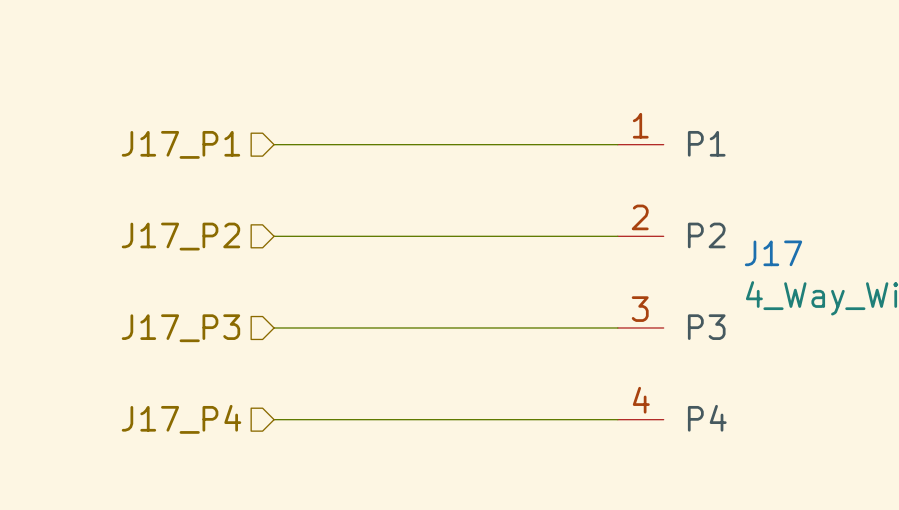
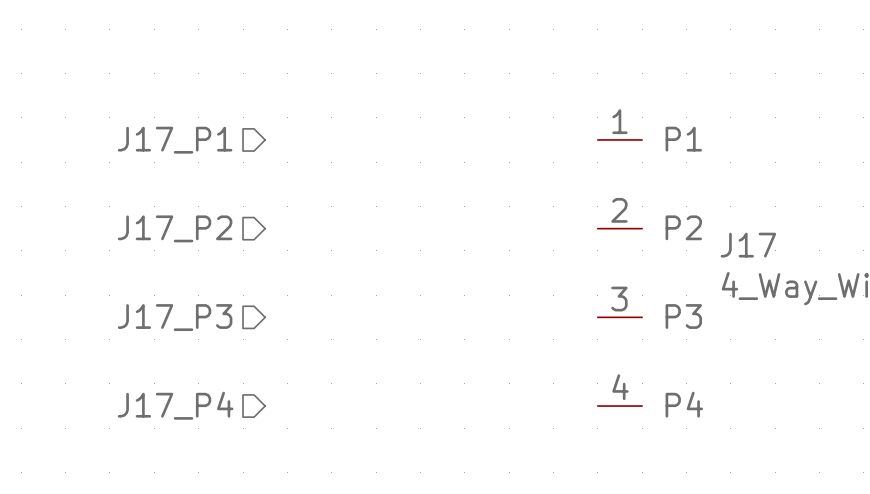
wire: (274, 144) (617, 144) -> none
wire: (274, 236) (617, 236) -> none
wire: (274, 327) (617, 327) -> none
wire: (274, 419) (617, 419) -> none

